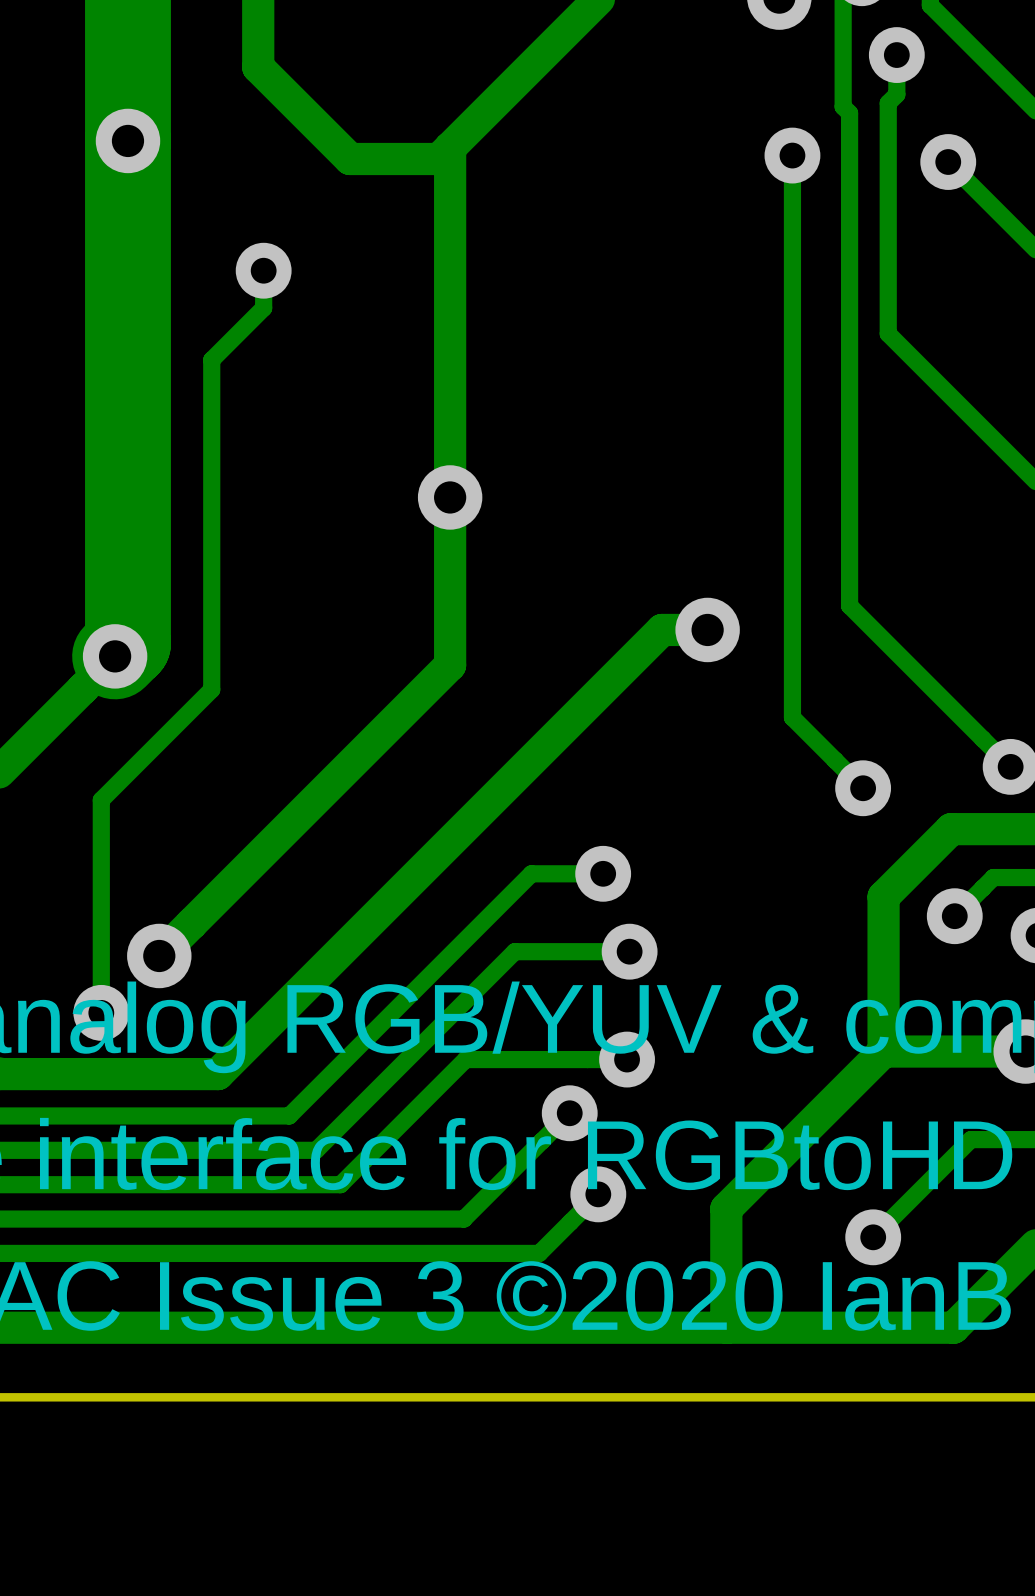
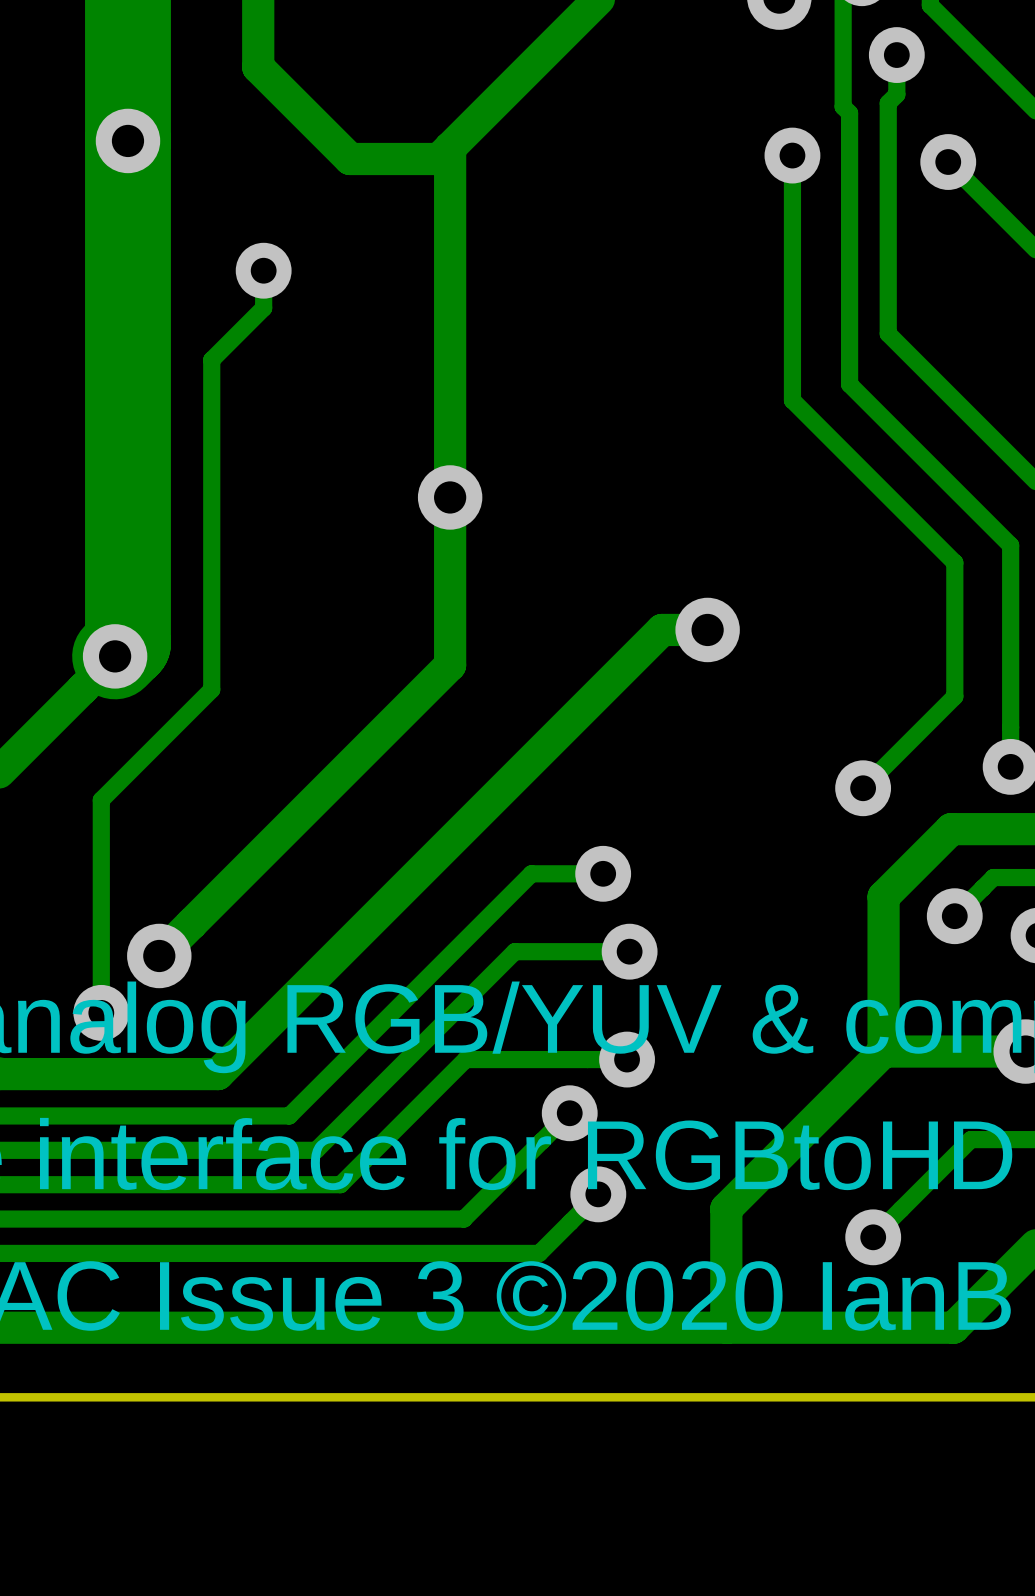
track: (849, 384) (849, 605) (1010, 766) -> (849, 384) (1010, 545) (1010, 766)
track: (792, 400) (792, 717) (863, 788) -> (792, 400) (954, 562) (954, 696) (863, 788)

